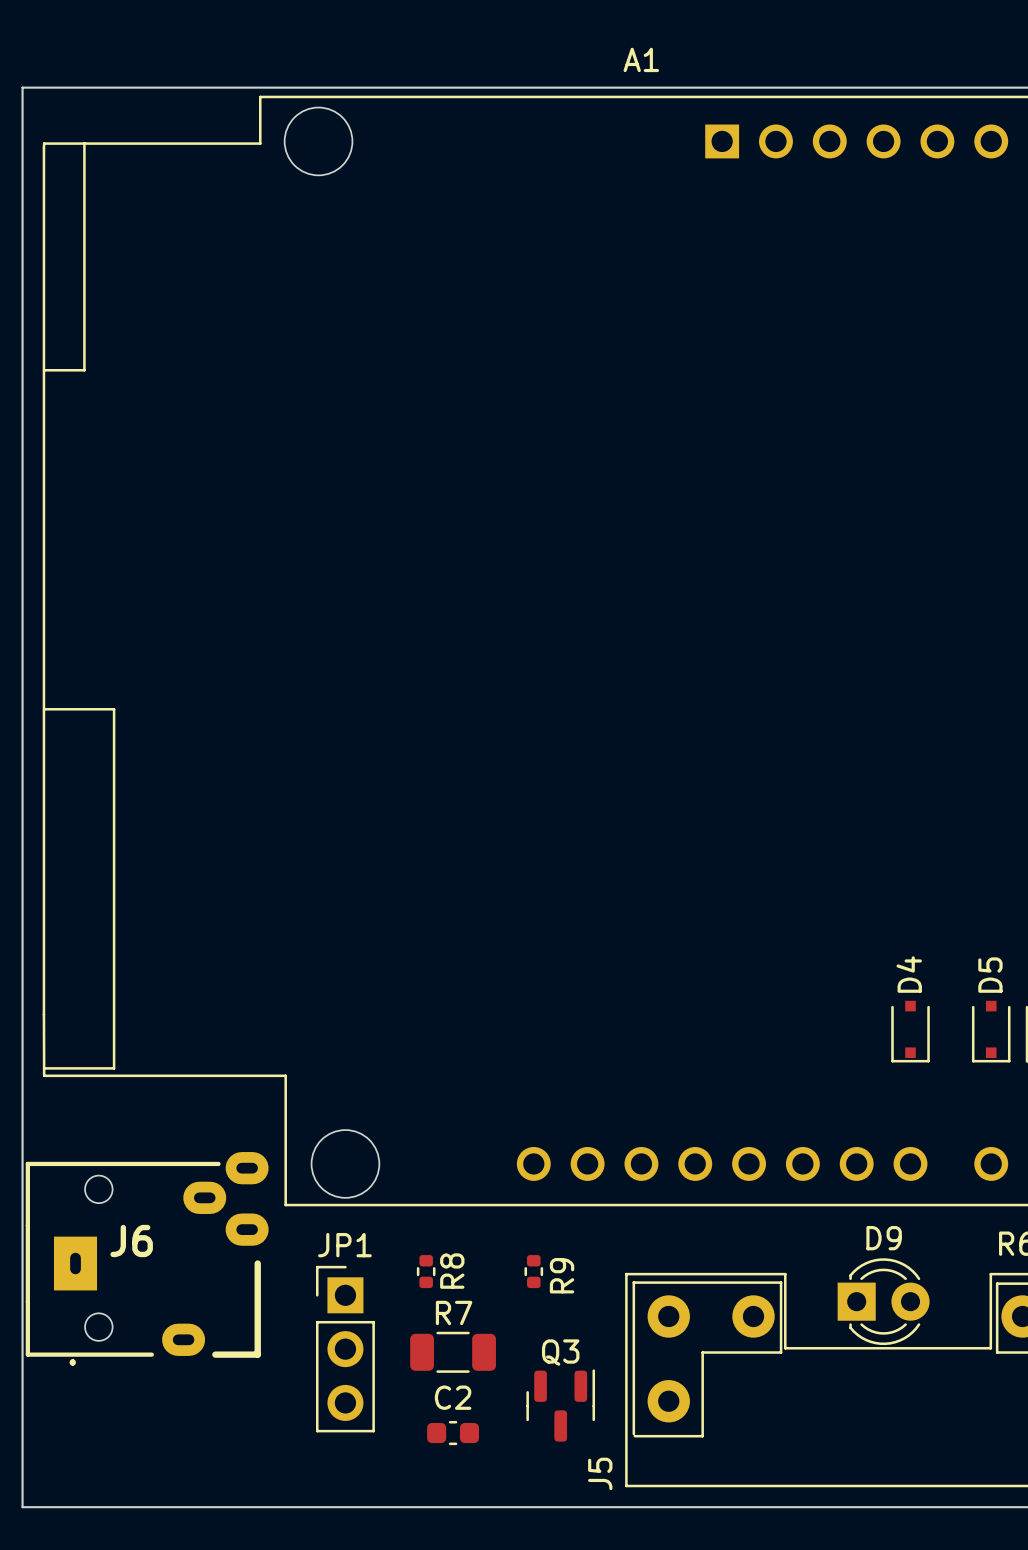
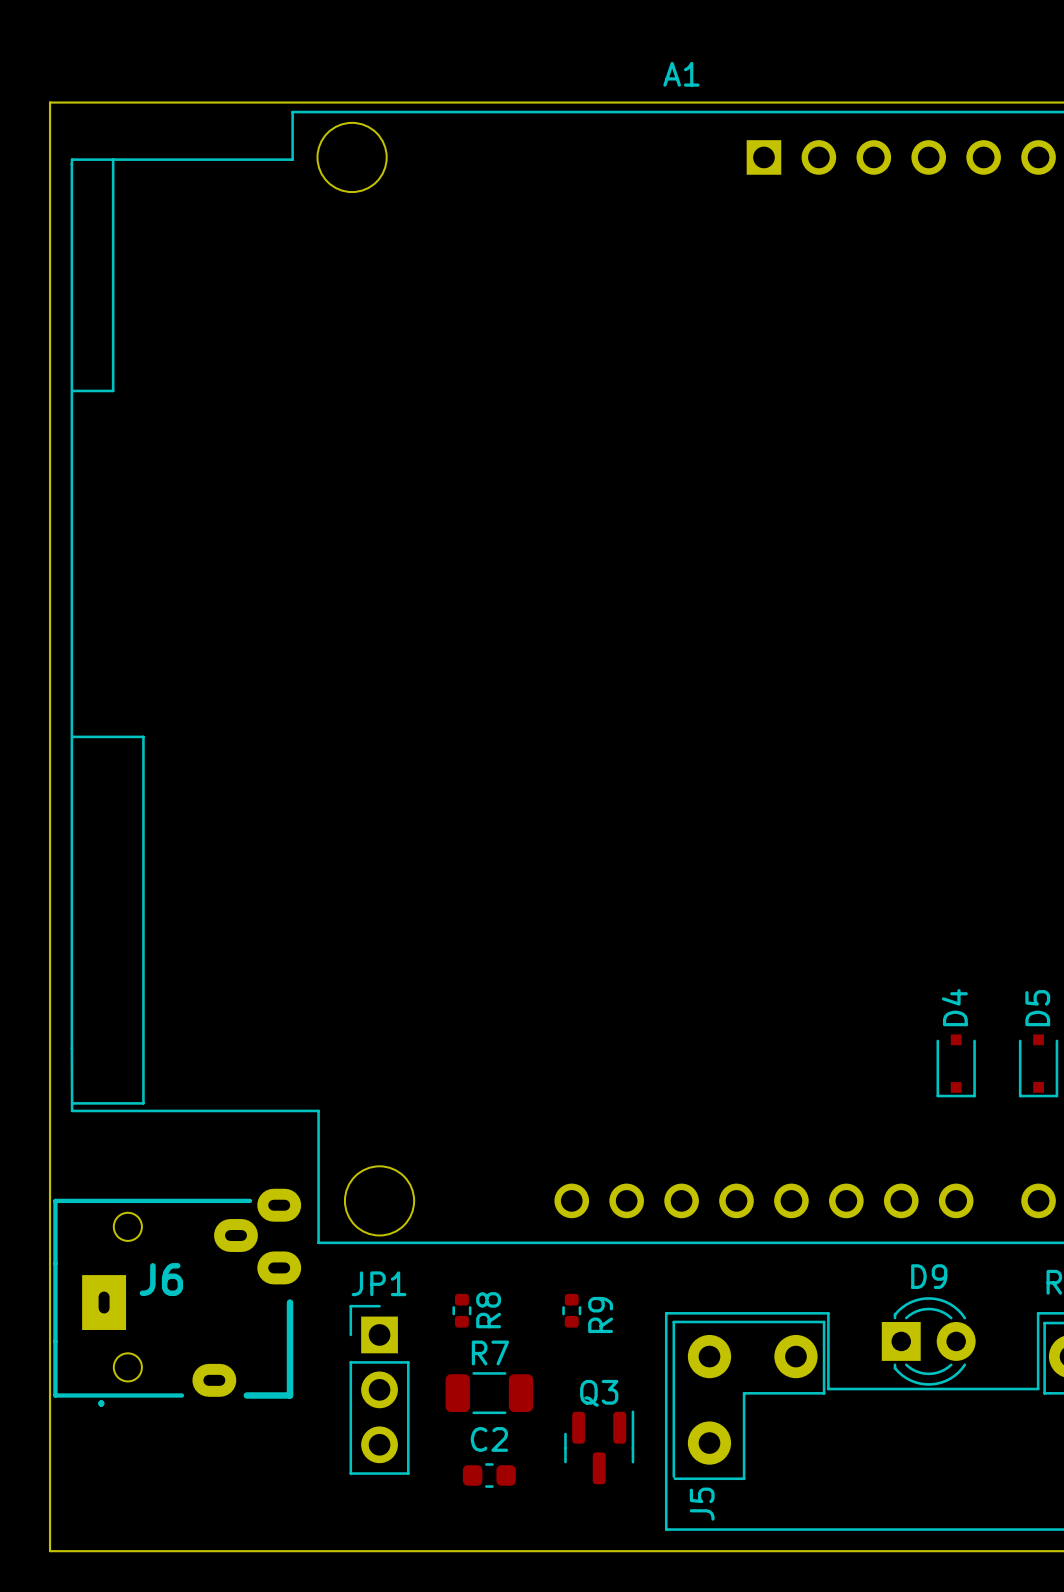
J5 name position: J5 (600, 1473) -> J5 (702, 1504)

